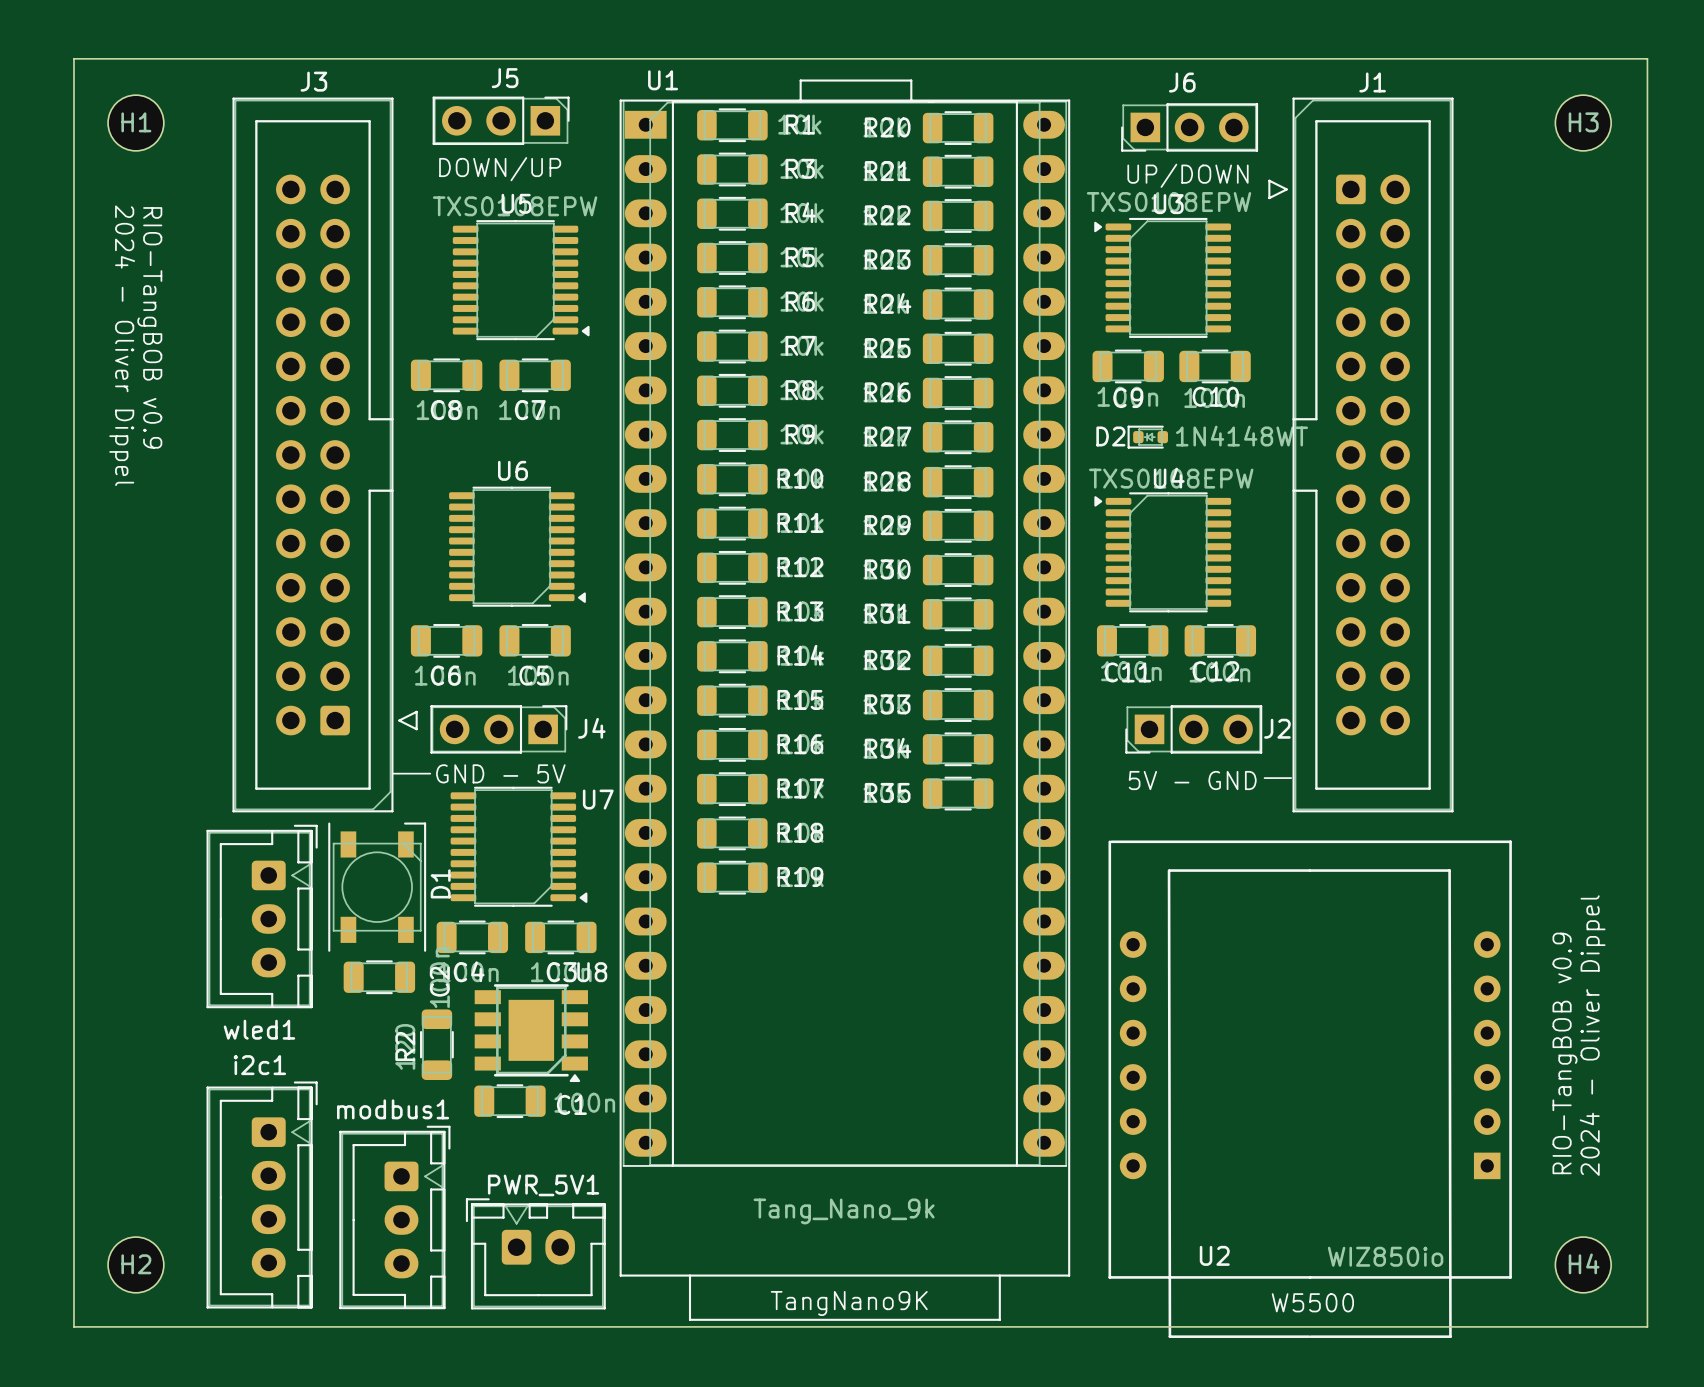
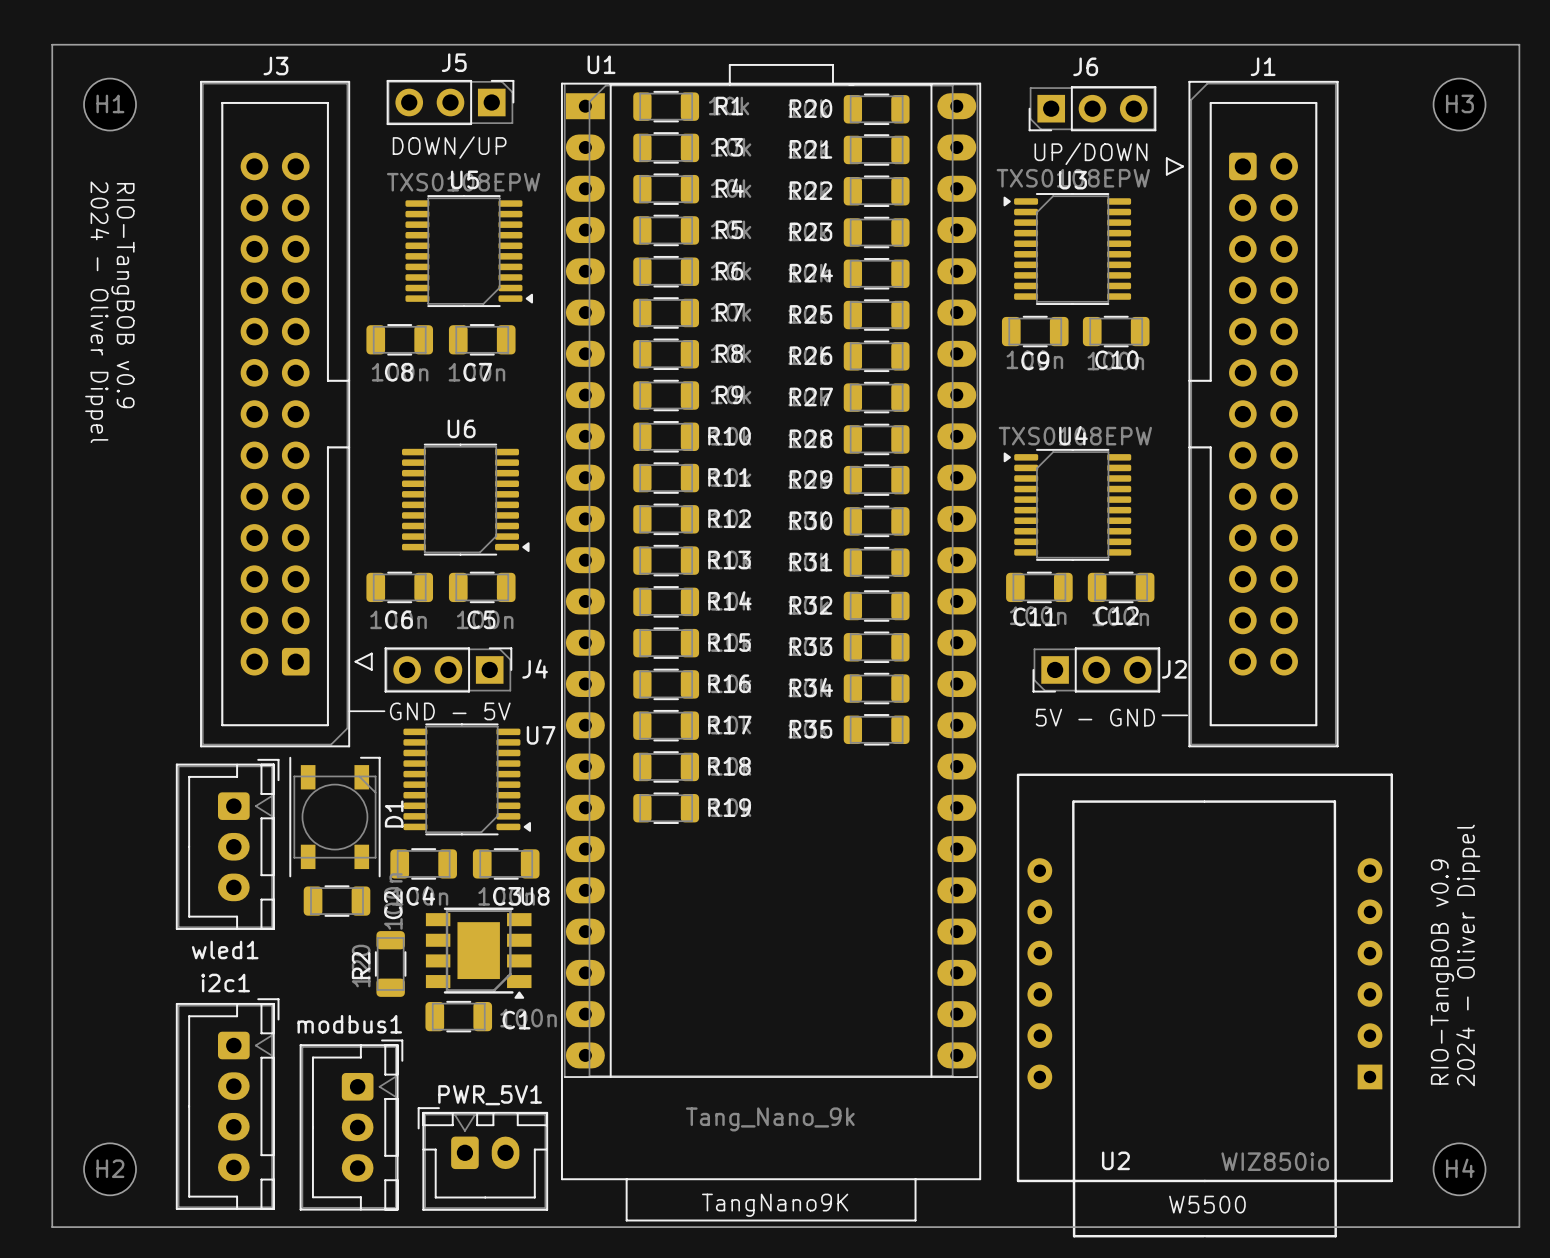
D2: 1N4148WT (1147, 437) -> none

